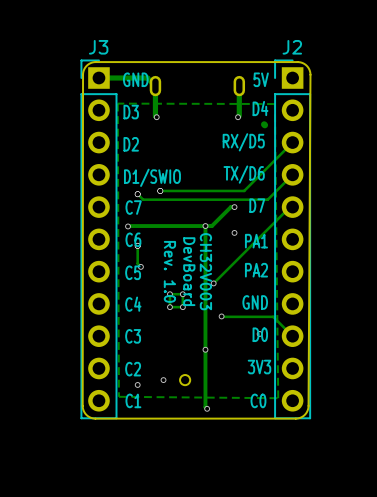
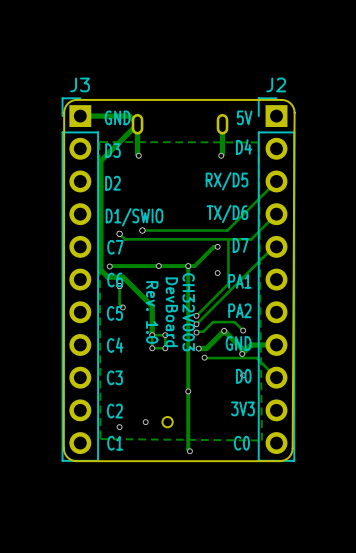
track: none -> (137, 124) (100, 160) (100, 270) (108, 277) (123, 277) (152, 306) (152, 335)
track: (264, 124) (264, 125) -> none
track: none -> (228, 239) (228, 283) (196, 315)
via: none -> (158, 266)
via: none -> (196, 315)
track: none -> (243, 330) (234, 322) (213, 322) (203, 331) (196, 332)
via: none -> (243, 330)
via: none -> (224, 330)
via: none -> (196, 332)
track: none -> (276, 344) (251, 344) (242, 354) (242, 348) (224, 330) (206, 348) (198, 348)
via: none -> (198, 348)
via: none -> (242, 354)

